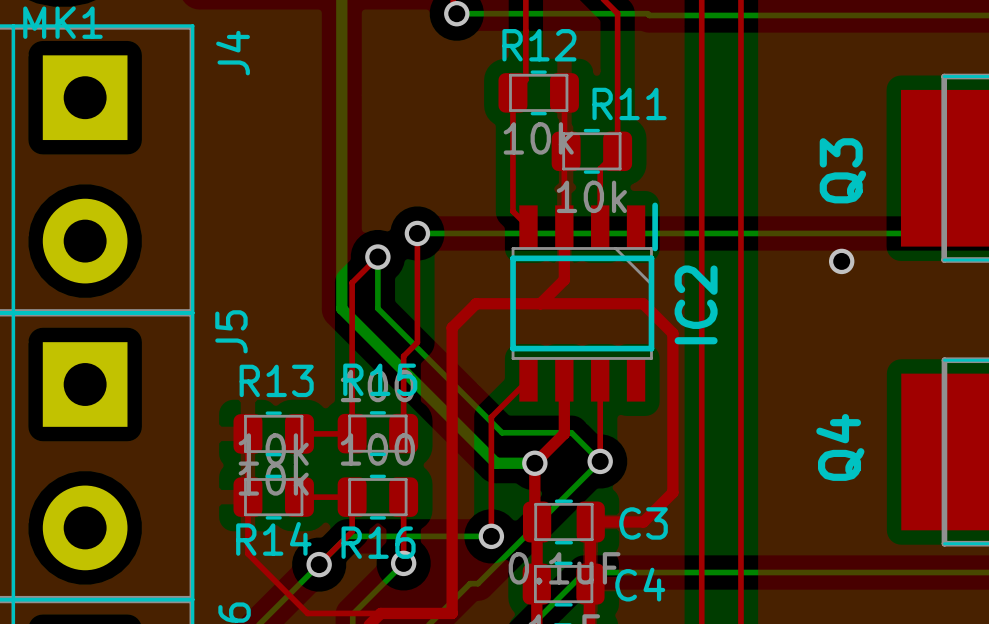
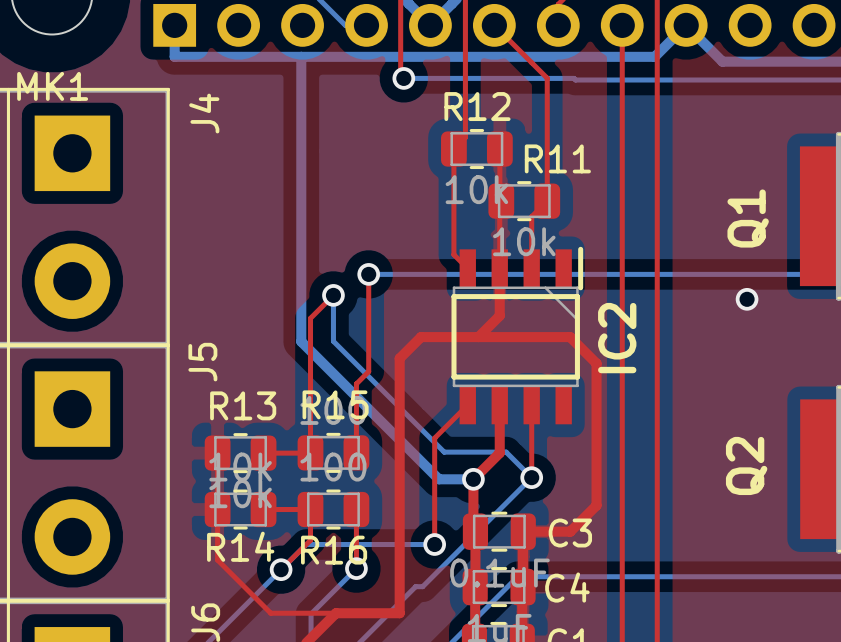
Q3 name: Q3 (842, 170) -> Q1 (748, 218)
Q4 name: Q4 (840, 447) -> Q2 (746, 465)

